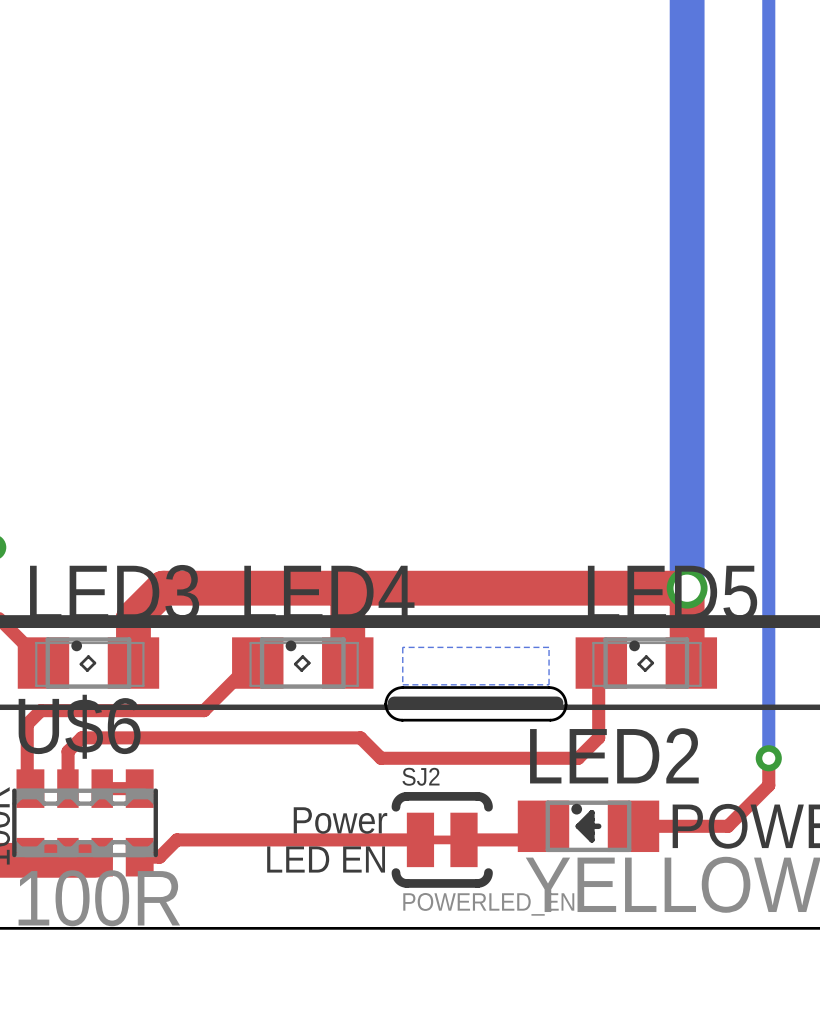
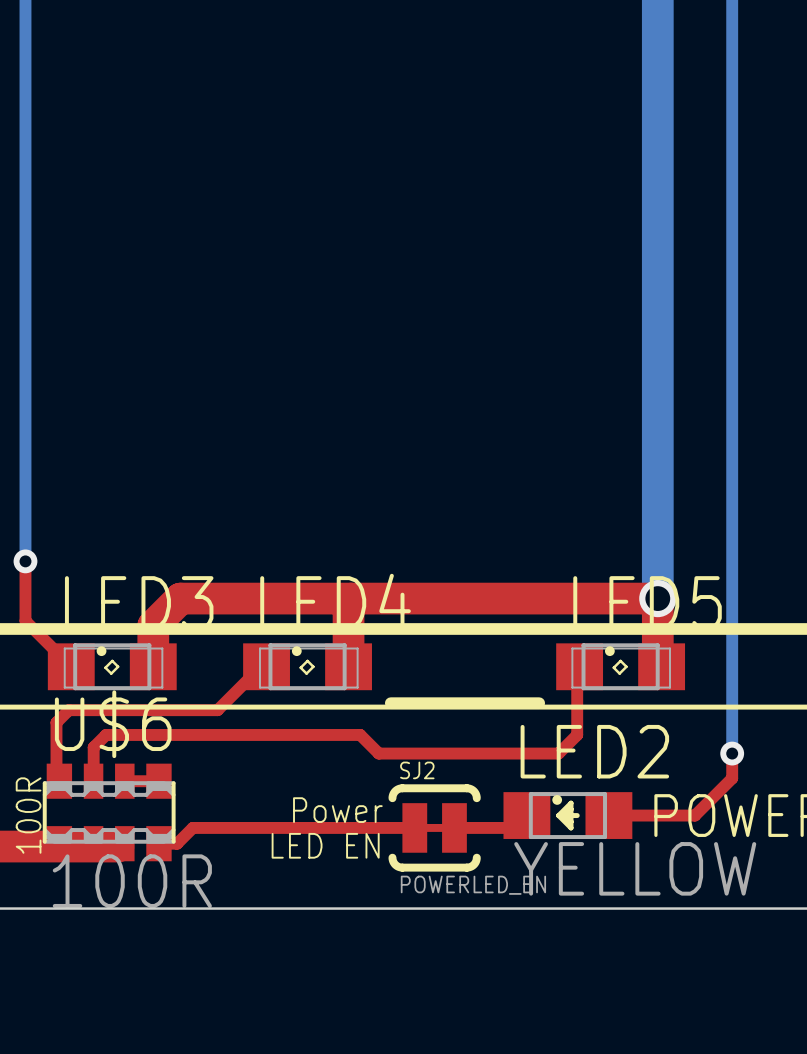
bottom zone outline: (402, 647) (402, 684) (549, 684) (549, 647) (402, 647) -> none
board edge: (385, 703) (390, 715) (402, 720) -> none
board edge: (385, 704) (390, 692) (402, 687) (551, 687) (561, 692) (565, 702) (562, 714) (552, 720) (403, 720) -> none

